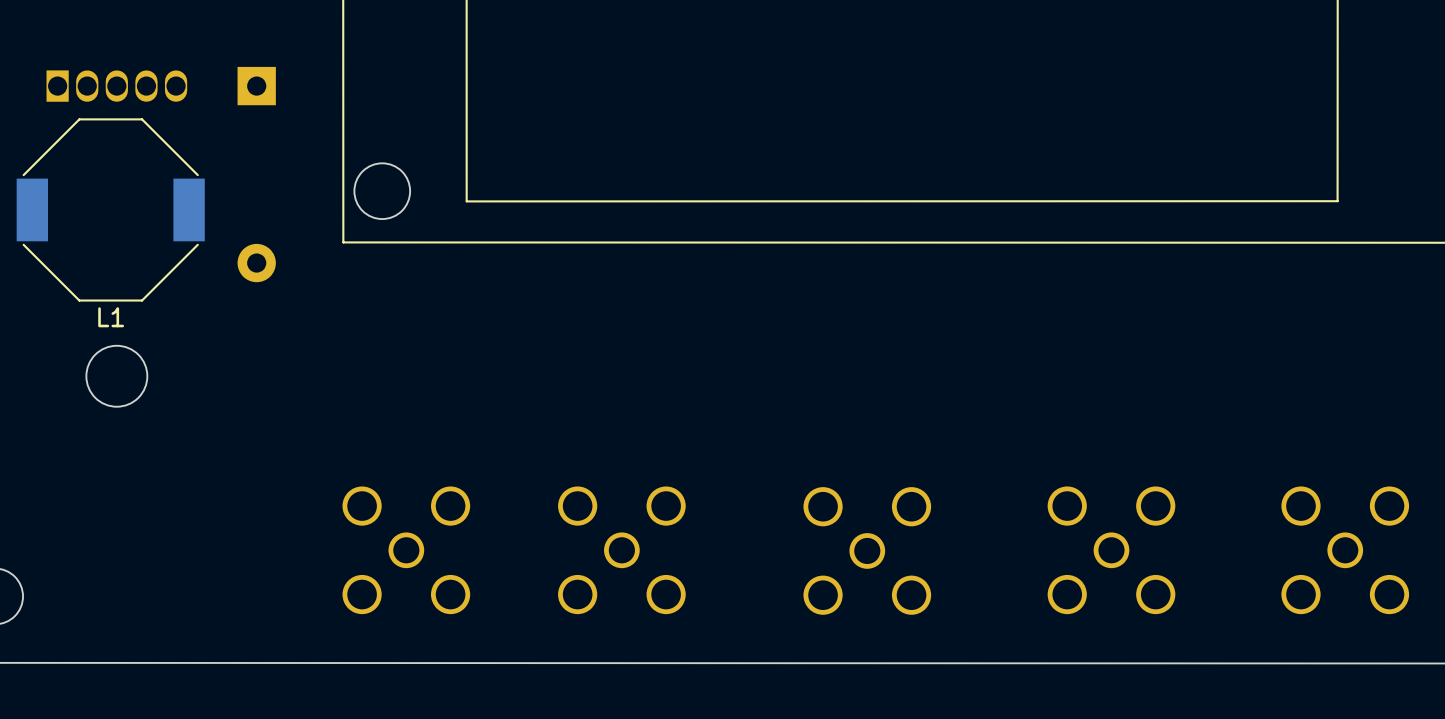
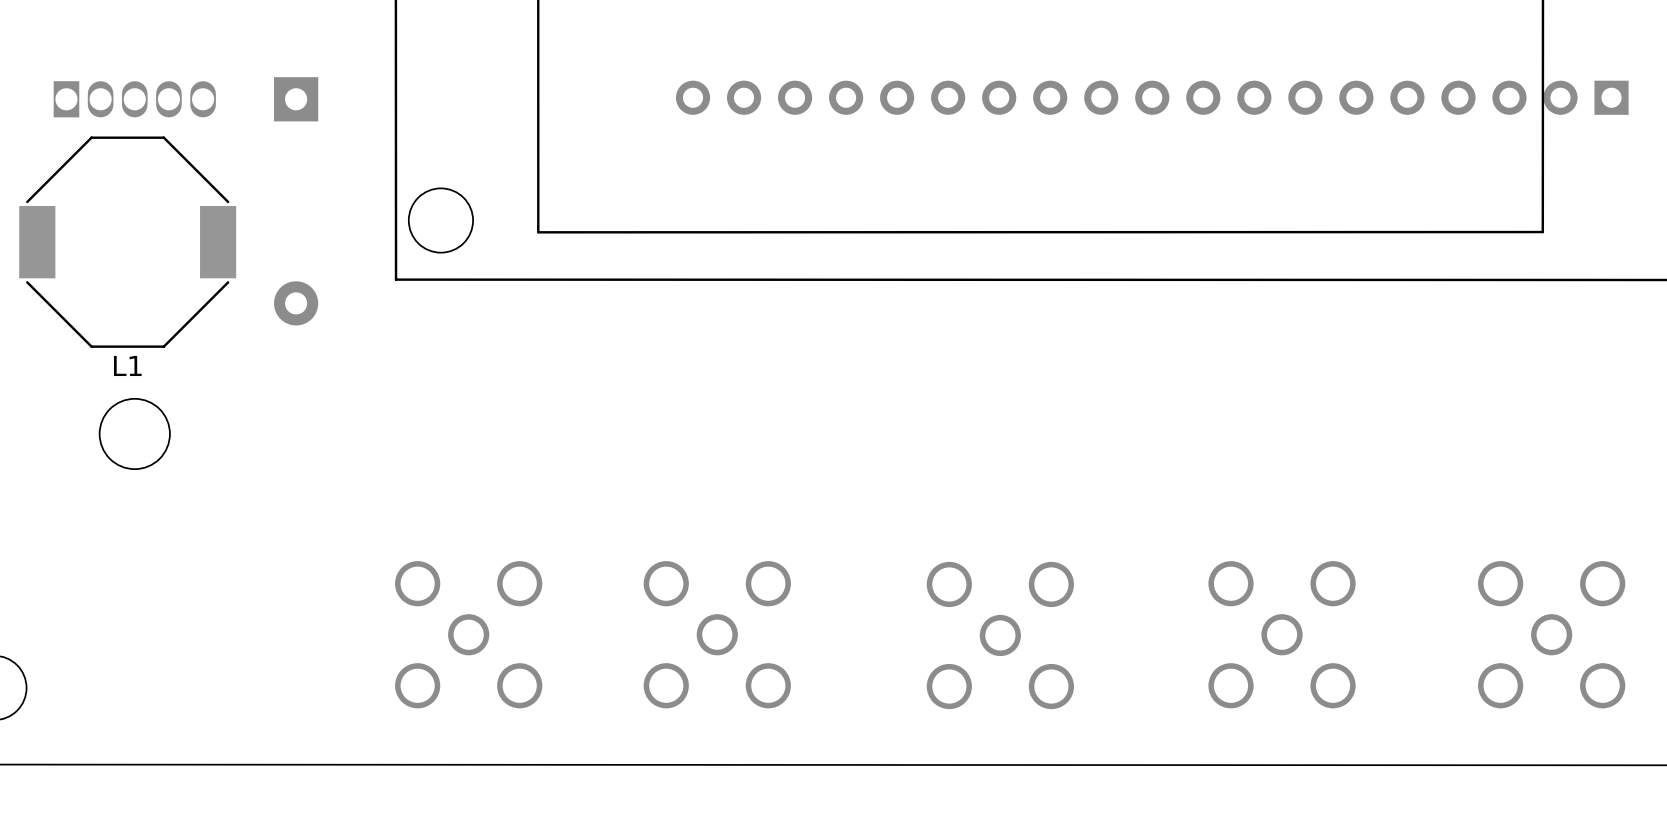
part: none -> (1152, 97)

